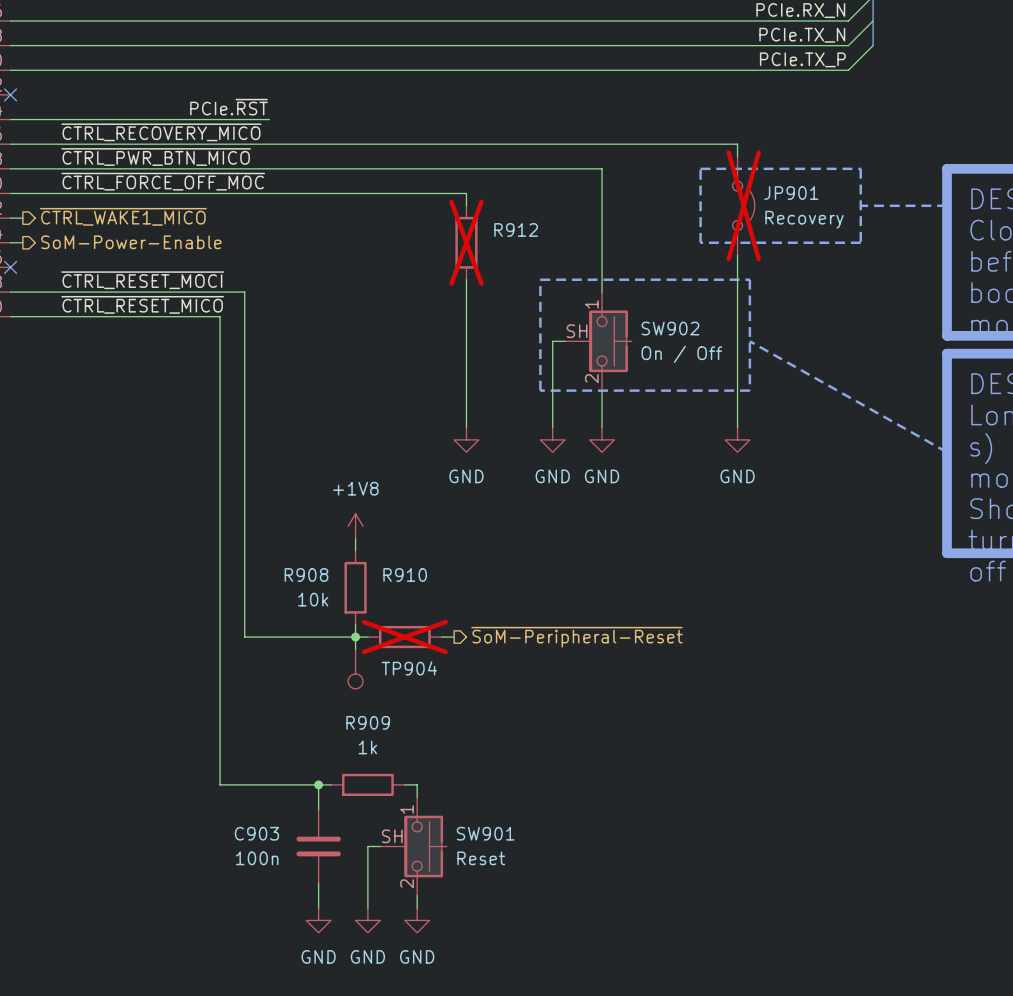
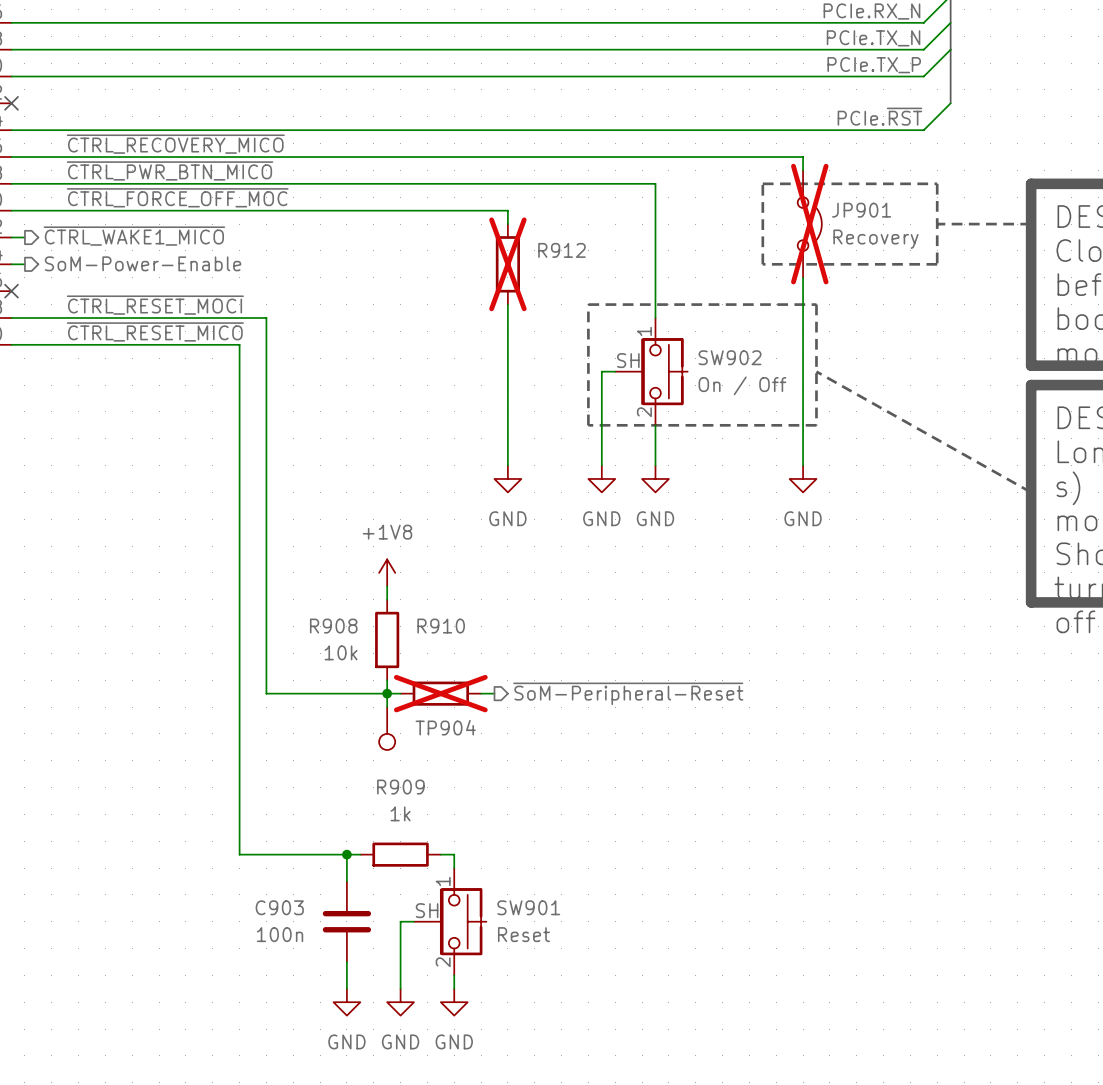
bus: none -> (950, 49) (950, 103)
wire: none -> (950, 103) (923, 130) (293, 130)
label: PCIe.~{RST} (229, 107) -> none
label: none -> PCIe.~{RST} (879, 116)

